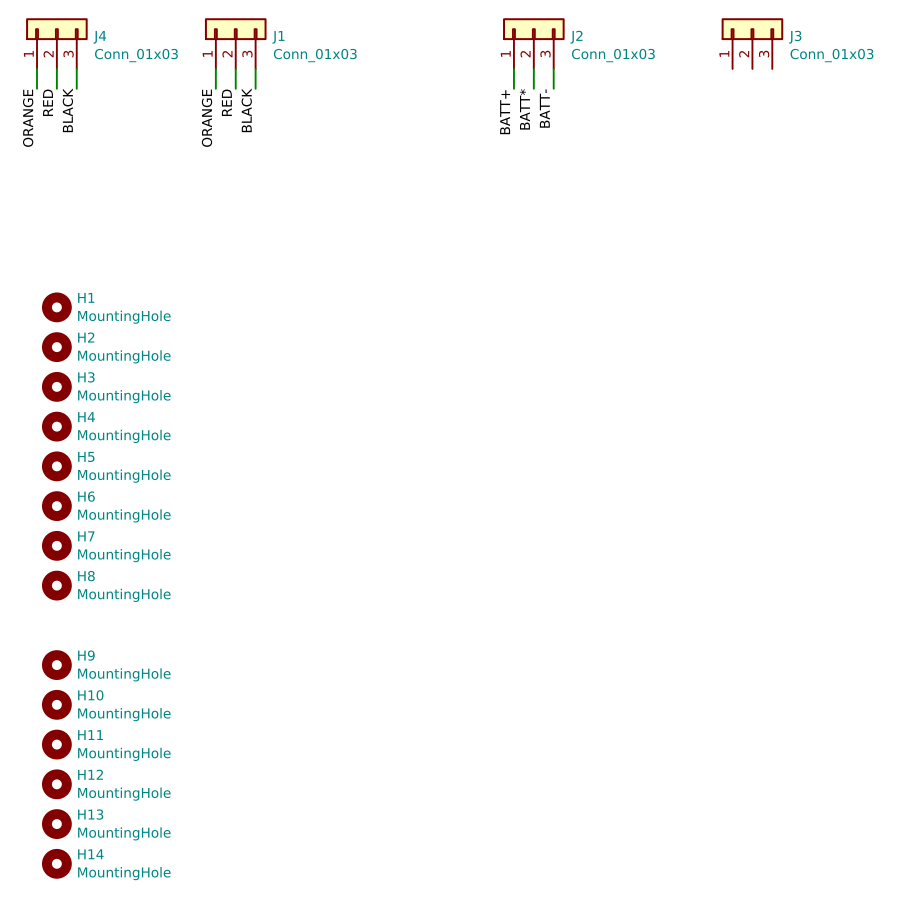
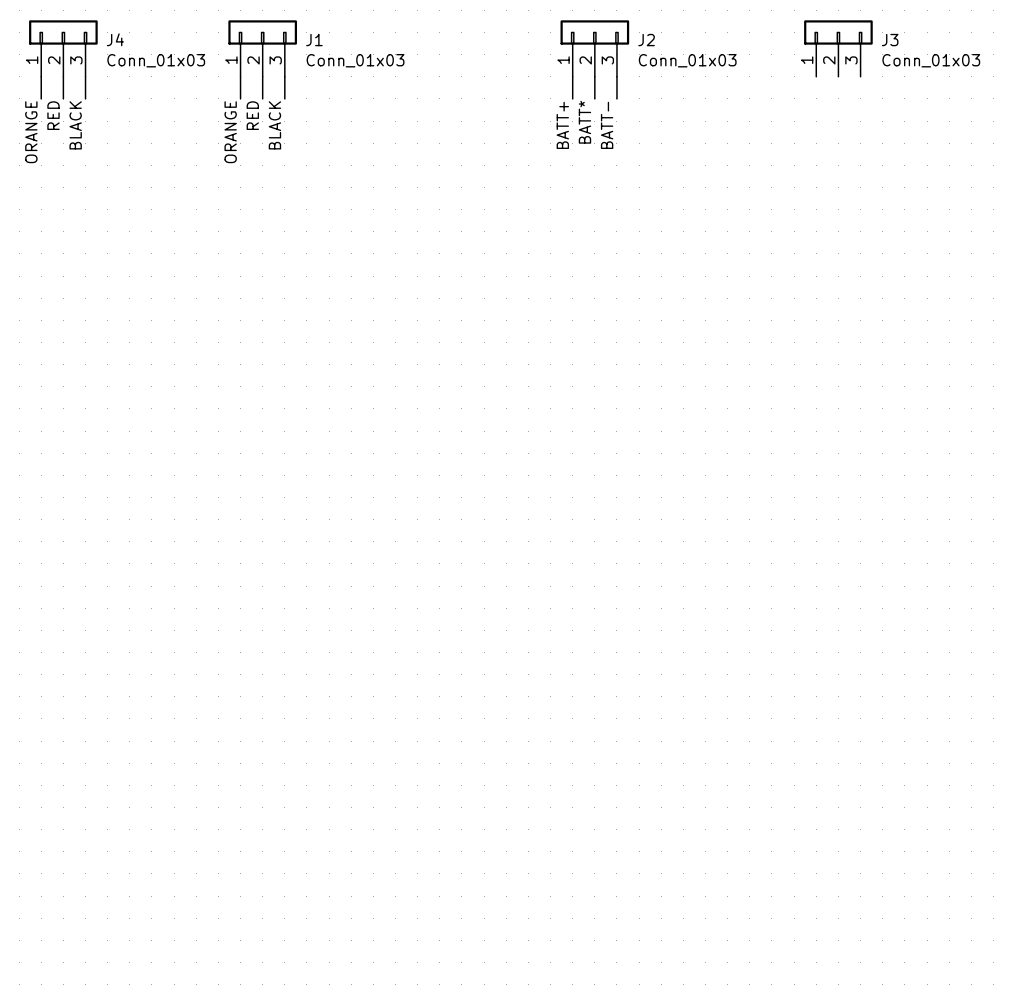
H1: MountingHole (56, 307) -> none
H2: MountingHole (56, 347) -> none
H3: MountingHole (56, 386) -> none
H4: MountingHole (56, 426) -> none
H5: MountingHole (56, 466) -> none
H6: MountingHole (56, 506) -> none
H7: MountingHole (56, 545) -> none
H8: MountingHole (56, 585) -> none
H9: MountingHole (56, 665) -> none
H10: MountingHole (56, 704) -> none
H11: MountingHole (56, 744) -> none
H12: MountingHole (56, 784) -> none
H13: MountingHole (56, 824) -> none
H14: MountingHole (56, 863) -> none

